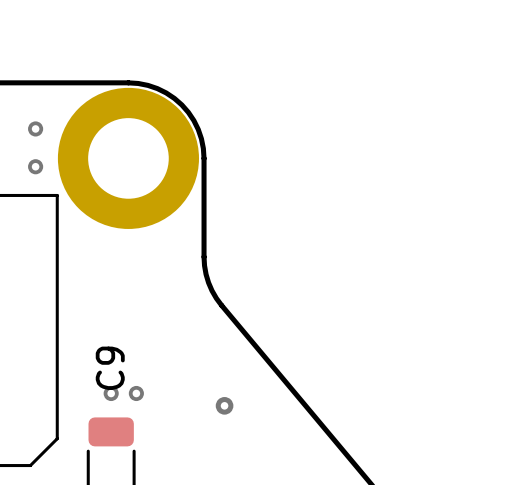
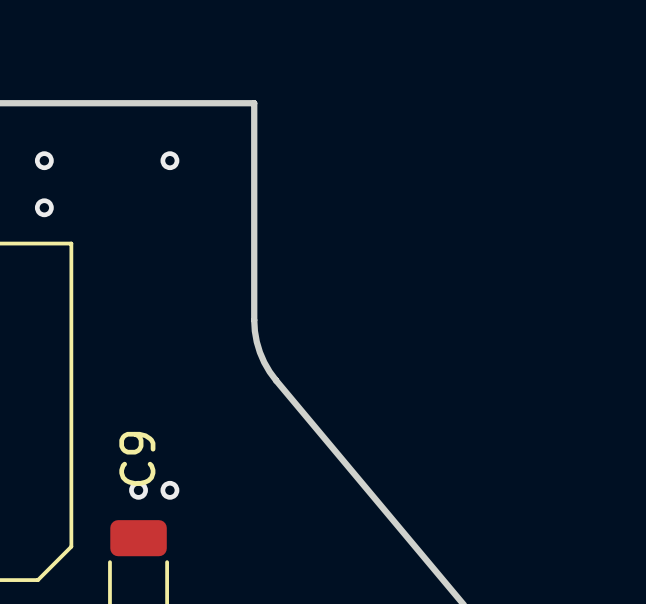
board edge: (128, 82) (157, 88) (181, 104) (198, 129) (204, 158) -> (160, 103) (254, 103) (254, 197)
via: none -> (169, 160)
part: (128, 158) -> none
via: (224, 405) -> none

